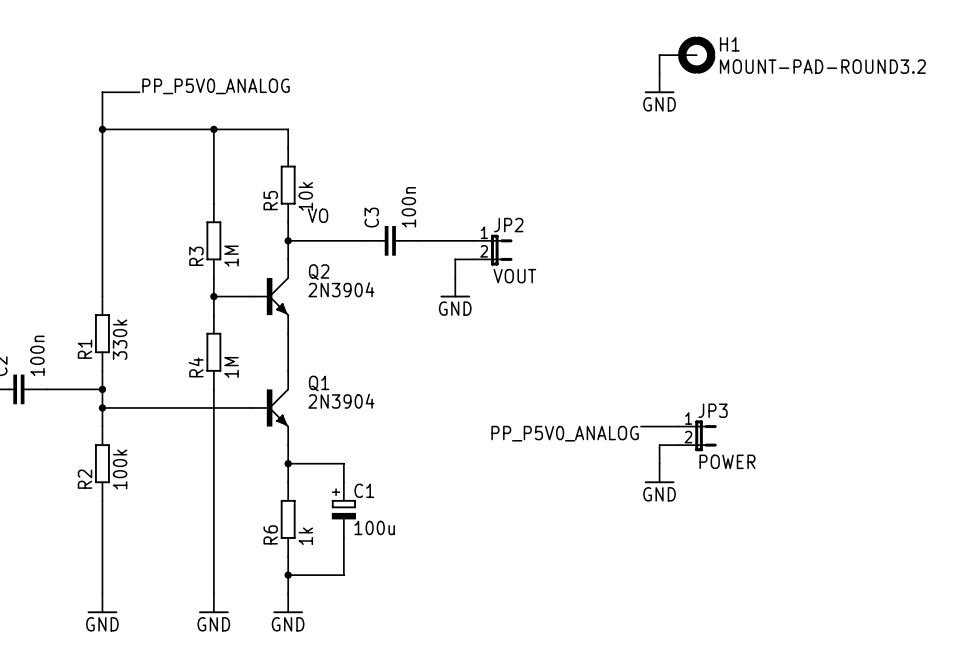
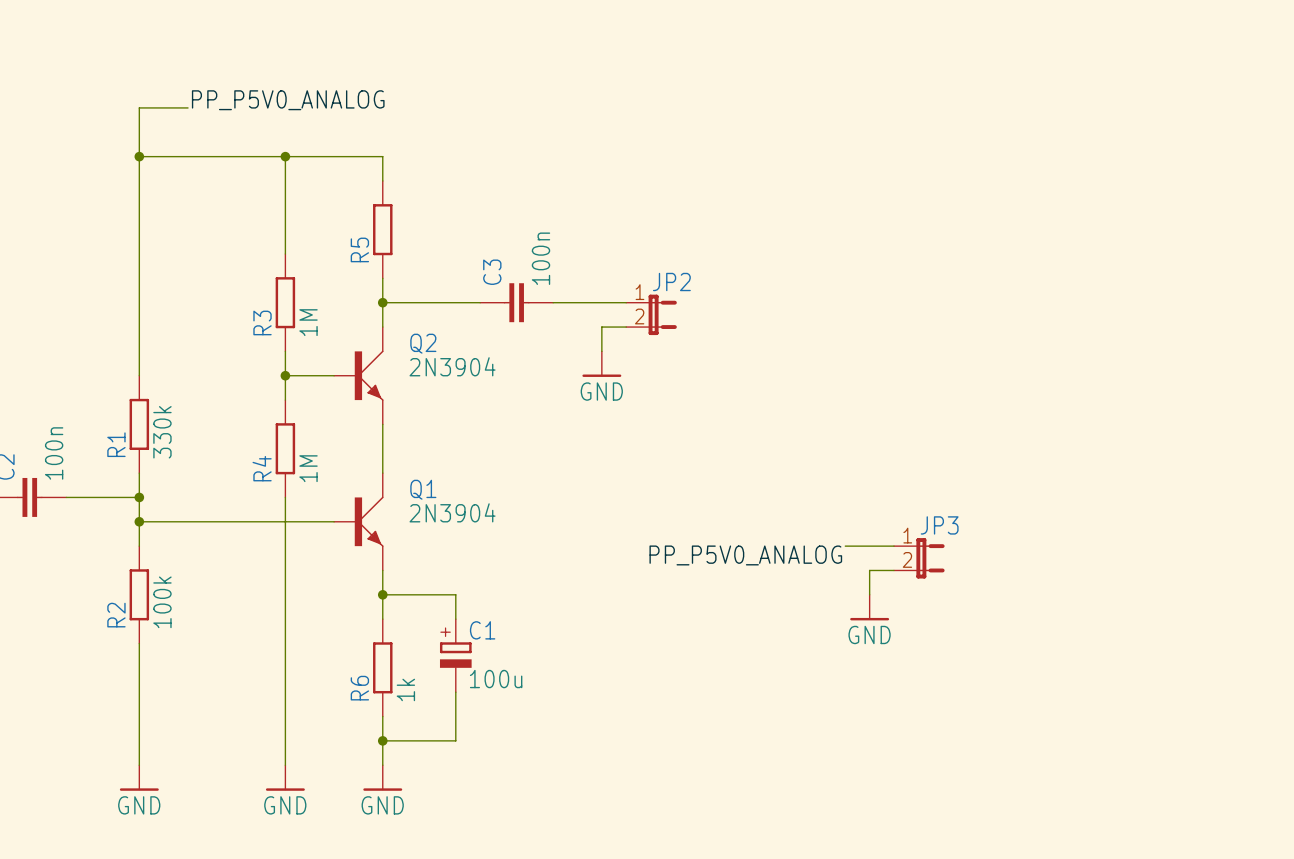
wire: (678, 55) (659, 55) (659, 73) -> none
H1: MOUNT-PAD-ROUND3.2 (696, 55) -> none
power symbol: GND (659, 83) -> none
R5 value: 10k (305, 196) -> none
label: VO (318, 215) -> none
JP2 value: VOUT (514, 276) -> none
JP3 value: POWER (727, 461) -> none

